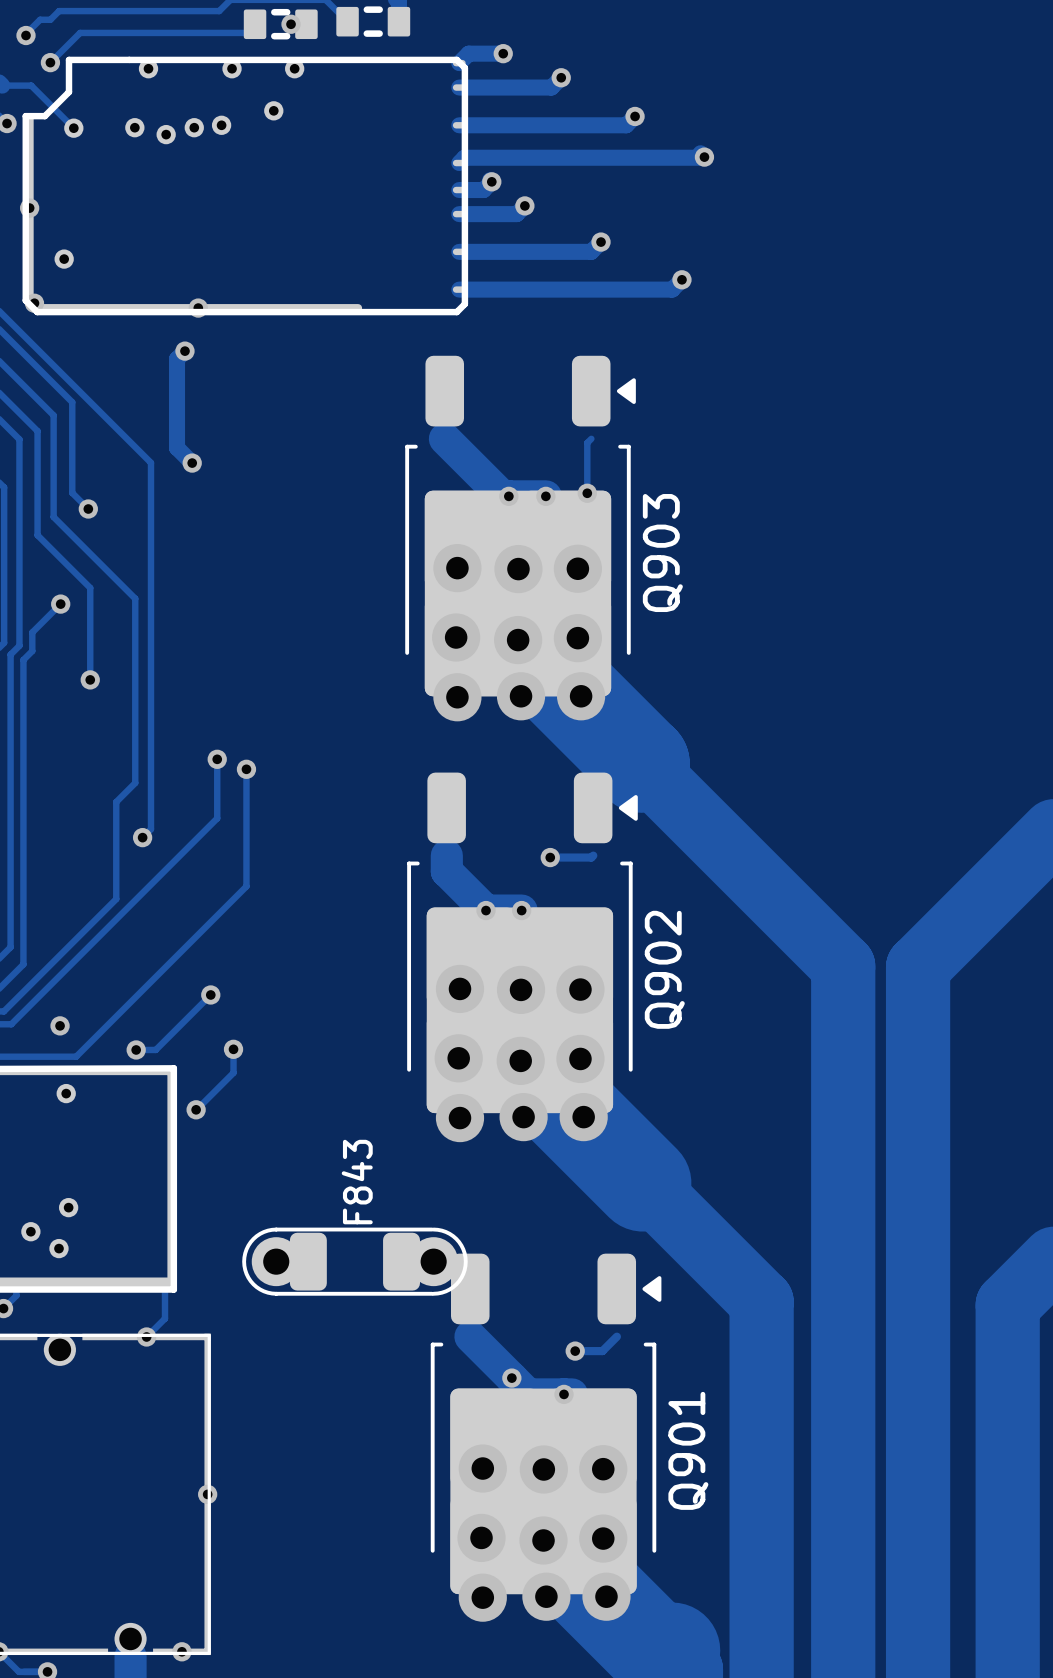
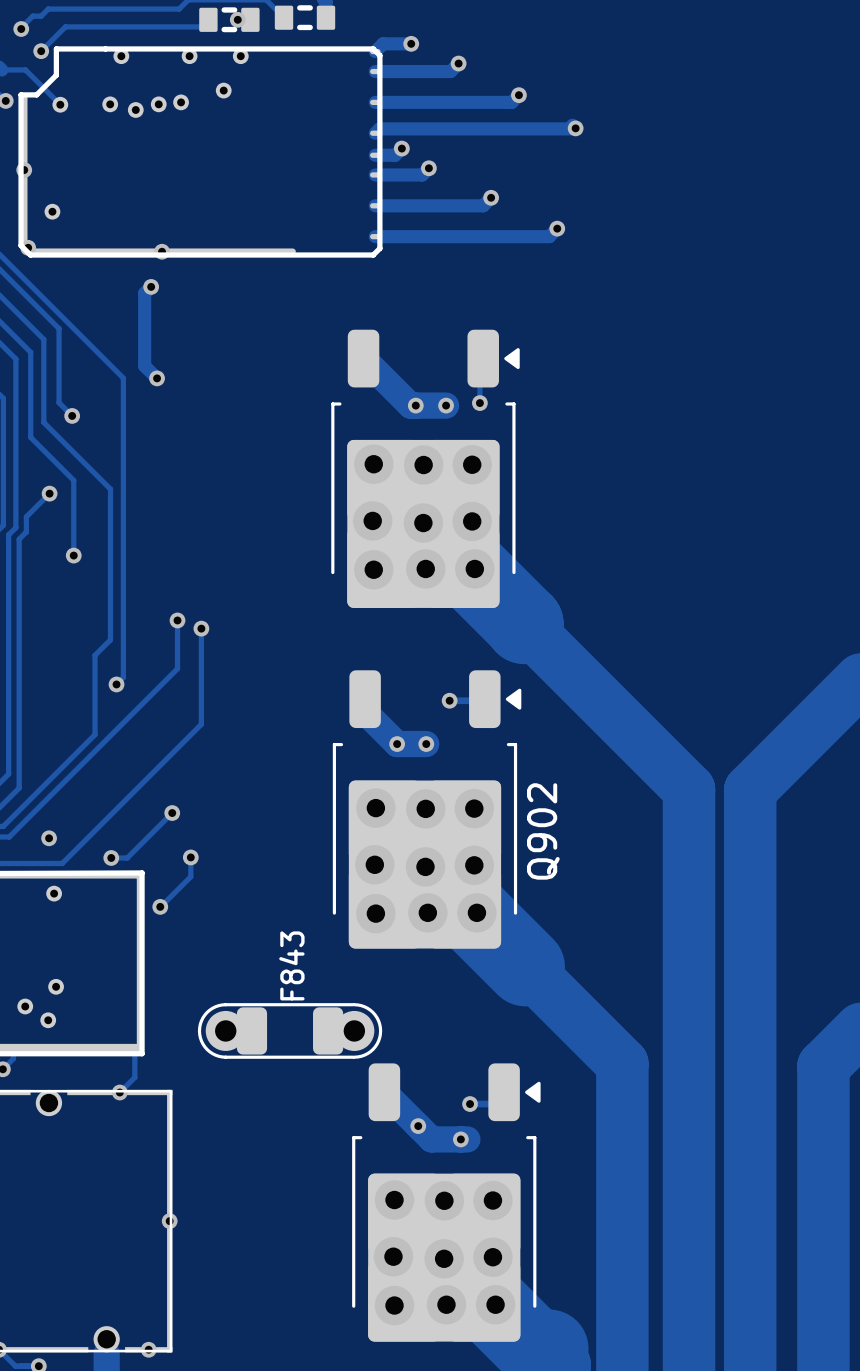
Q903: (520, 526) -> none
part: none -> (425, 468)
Q902 position: (522, 942) -> (427, 809)
Q901: (546, 1423) -> none
part: none -> (446, 1202)

